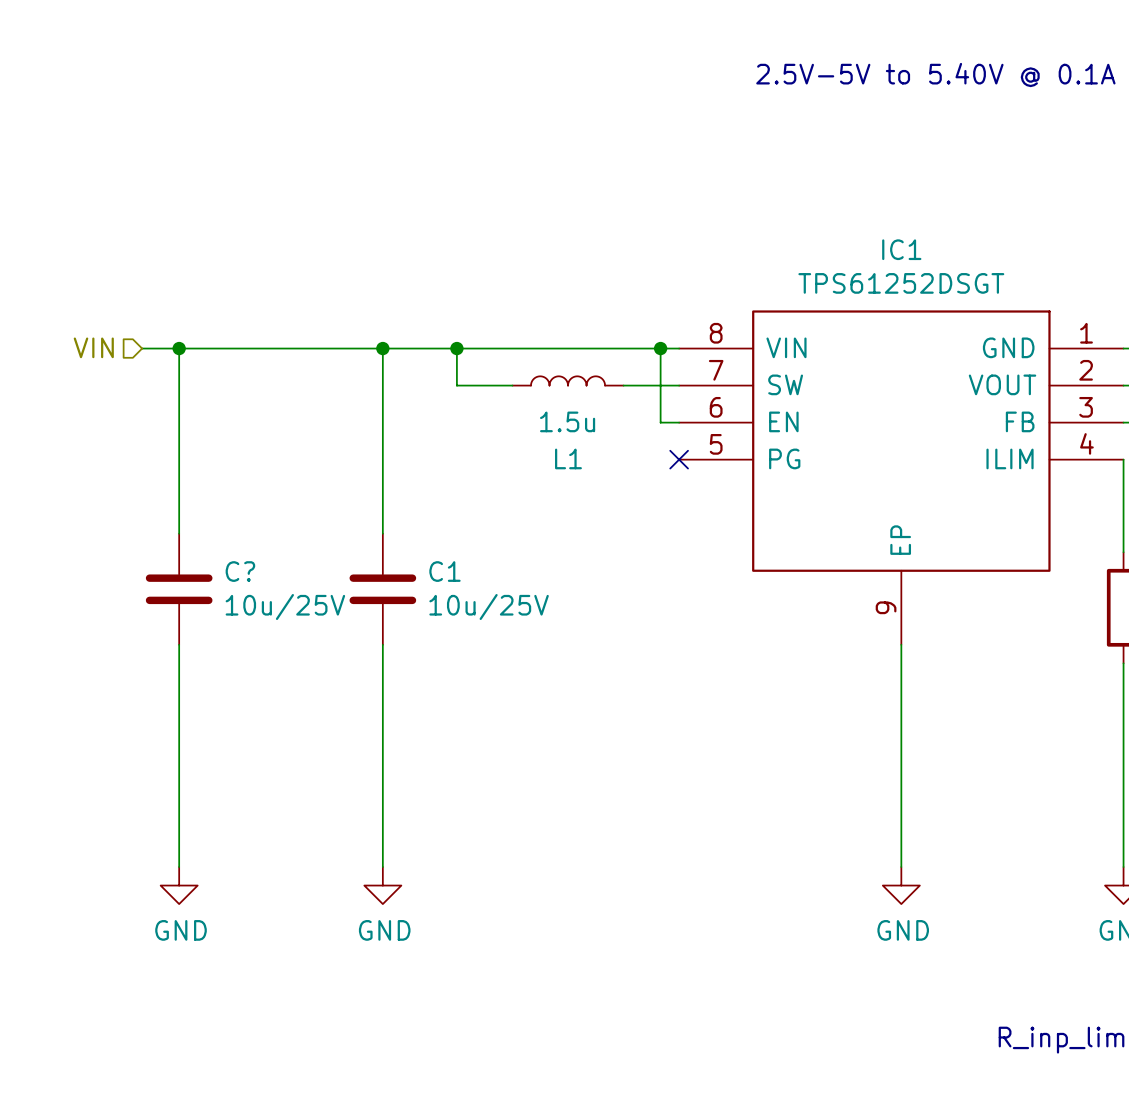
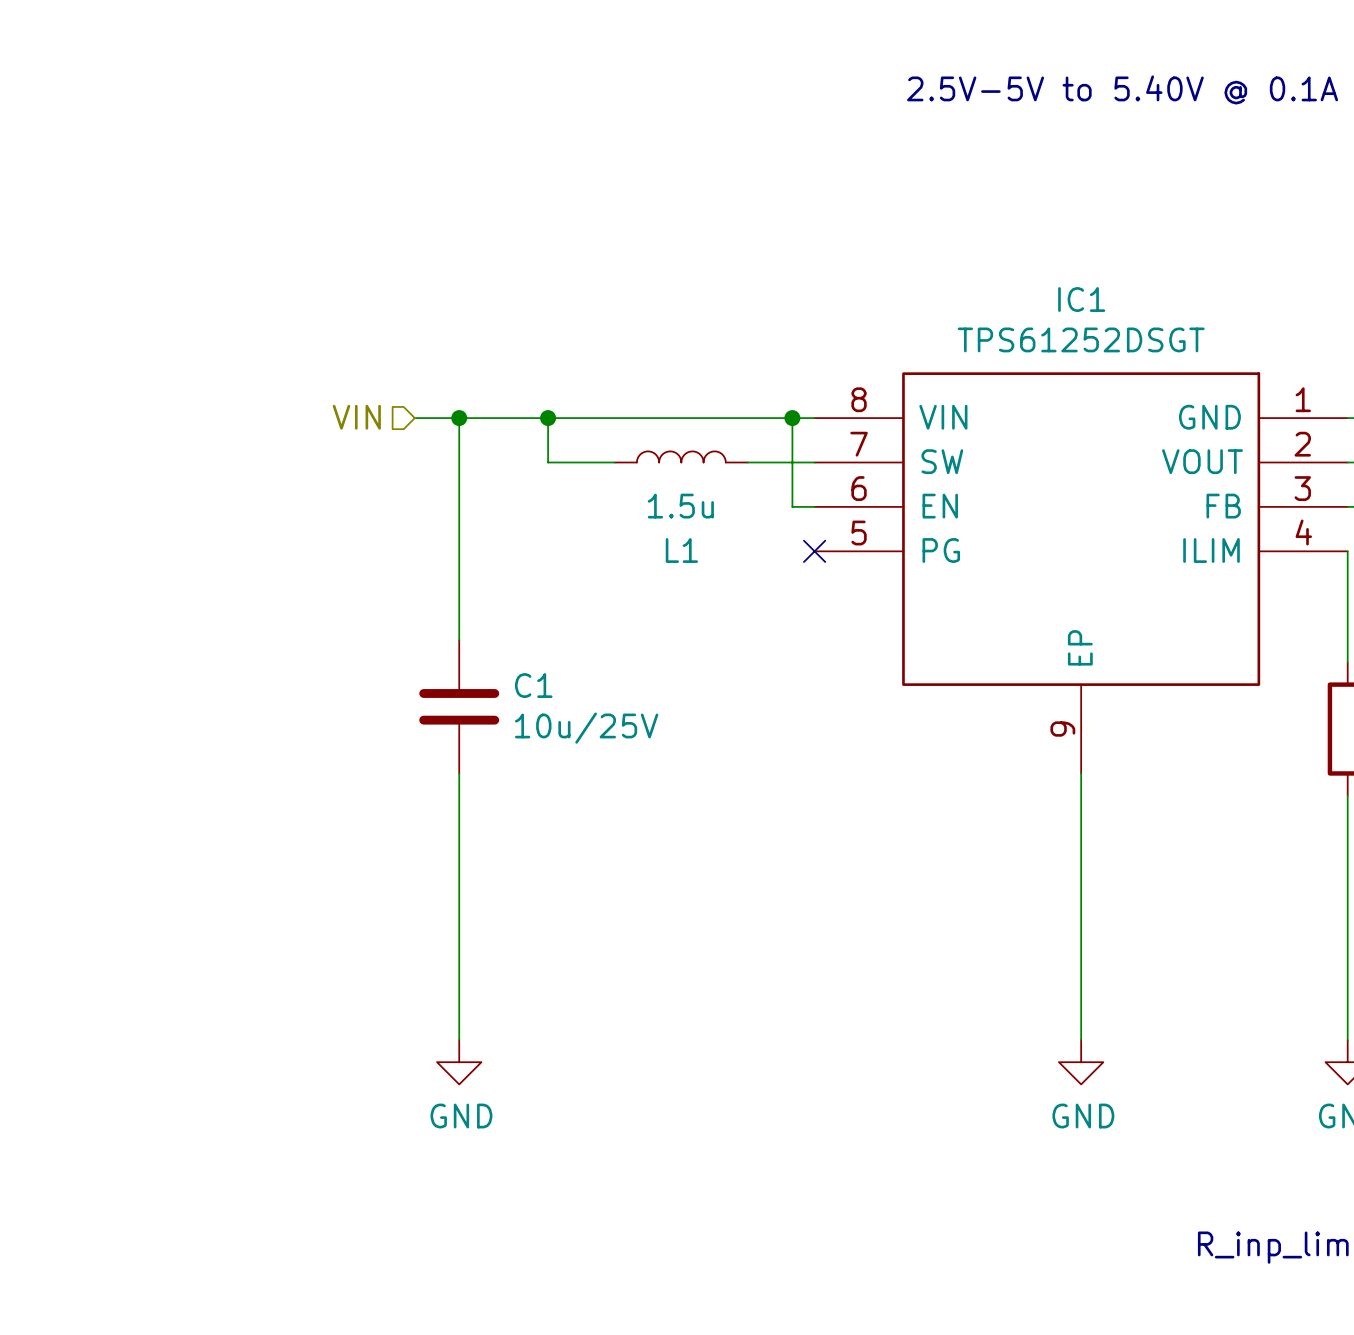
hierarchical label position: VIN (93, 347) -> VIN (356, 417)
wire: (142, 348) (345, 348) -> none
wire: (179, 348) (179, 533) -> none
junction: (179, 348) -> none
C?: 10u/25V (179, 589) -> none
wire: (179, 644) (179, 867) -> none
power symbol: GND (179, 885) -> none

